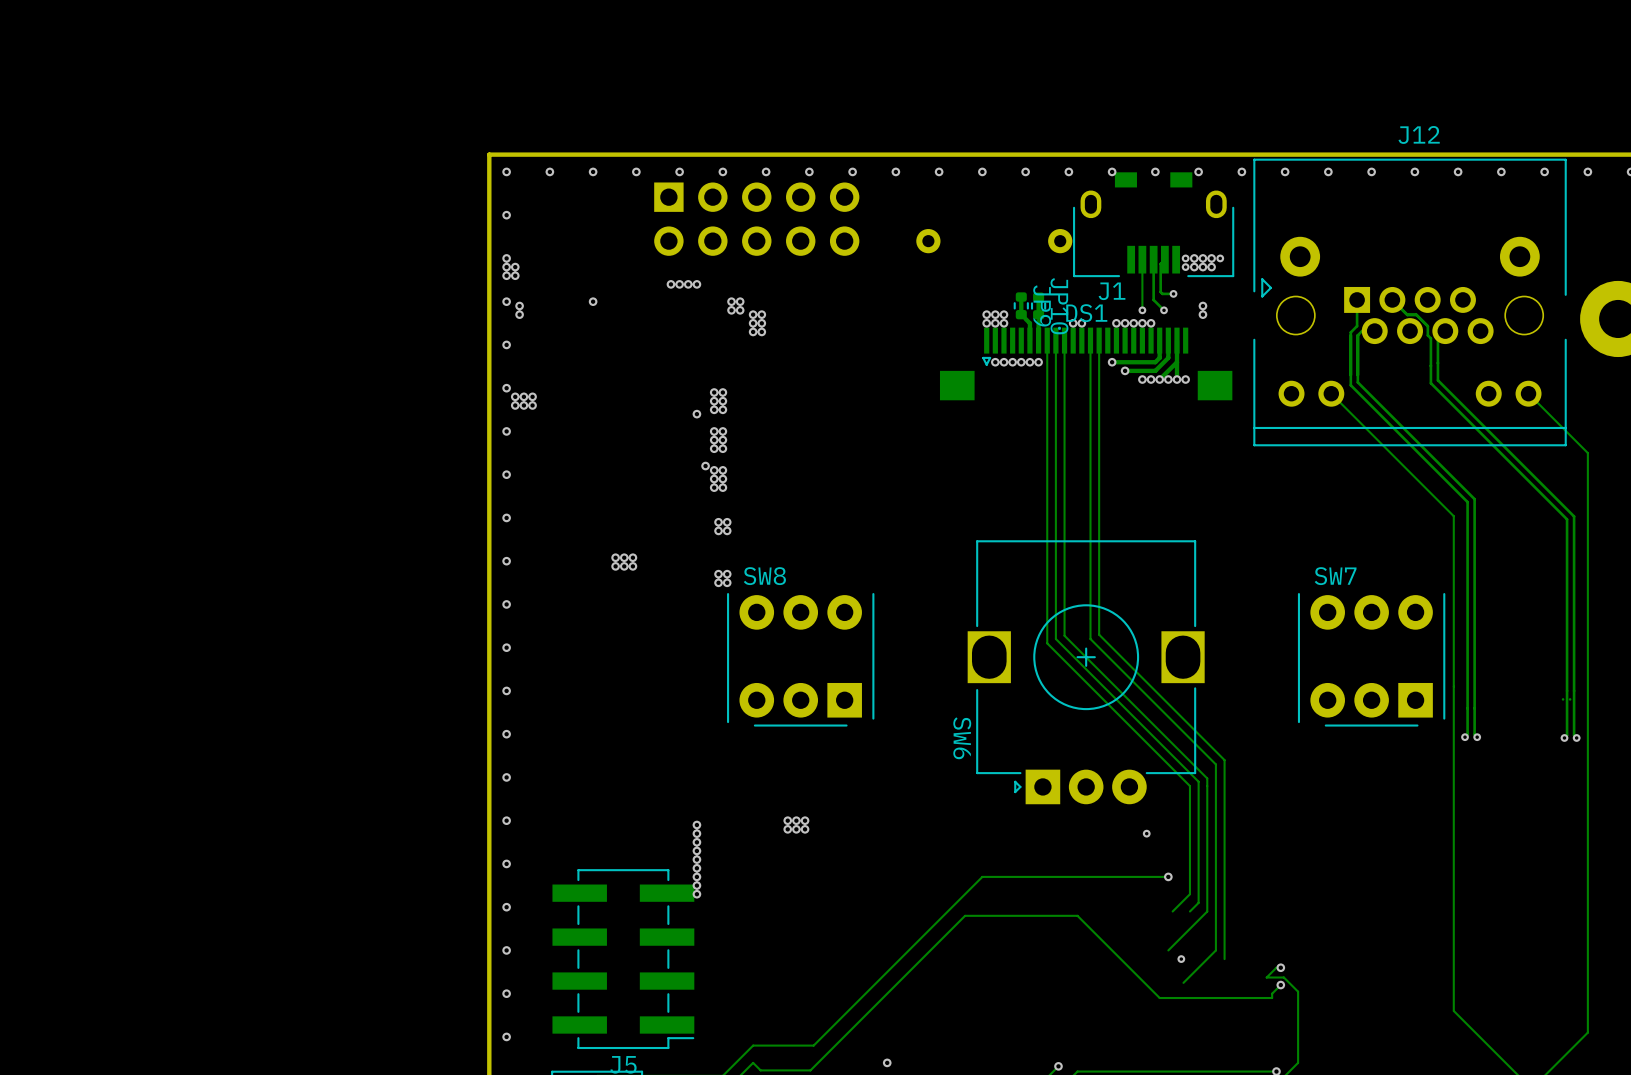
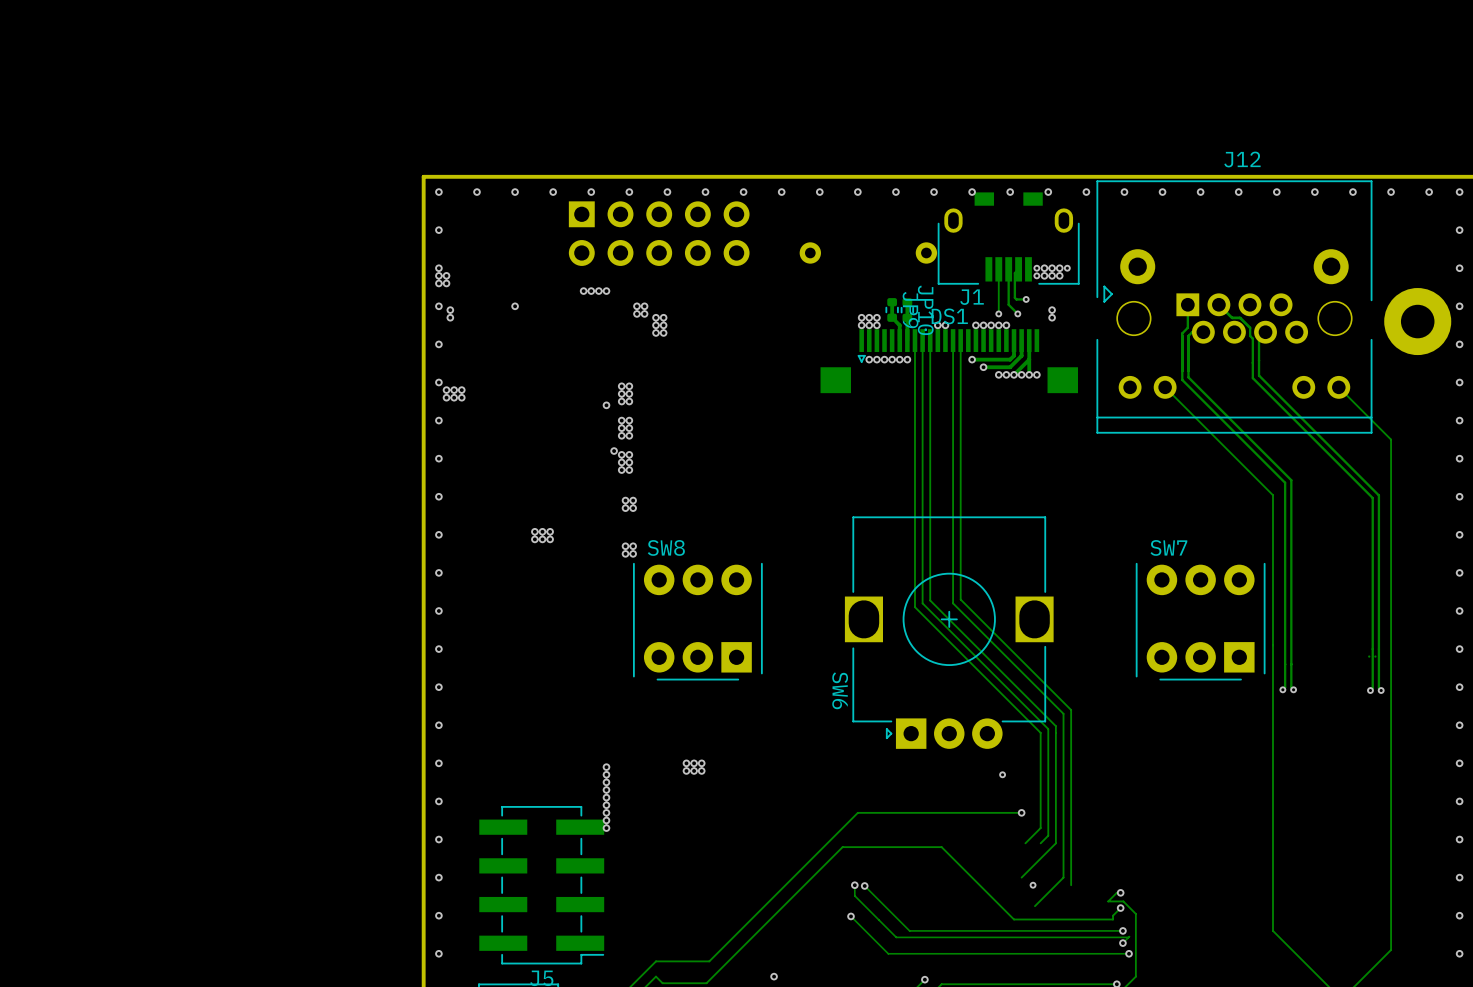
track: none -> (854, 885) (854, 895) (896, 937) (1128, 937)
via: none -> (854, 885)
track: none -> (864, 885) (909, 930) (1122, 930)
via: none -> (864, 885)
track: none -> (850, 915) (888, 953) (1129, 953)
via: none -> (851, 916)
via: none -> (1122, 930)
track: none -> (1129, 936) (1122, 943)
via: none -> (1122, 943)
via: none -> (1129, 953)

